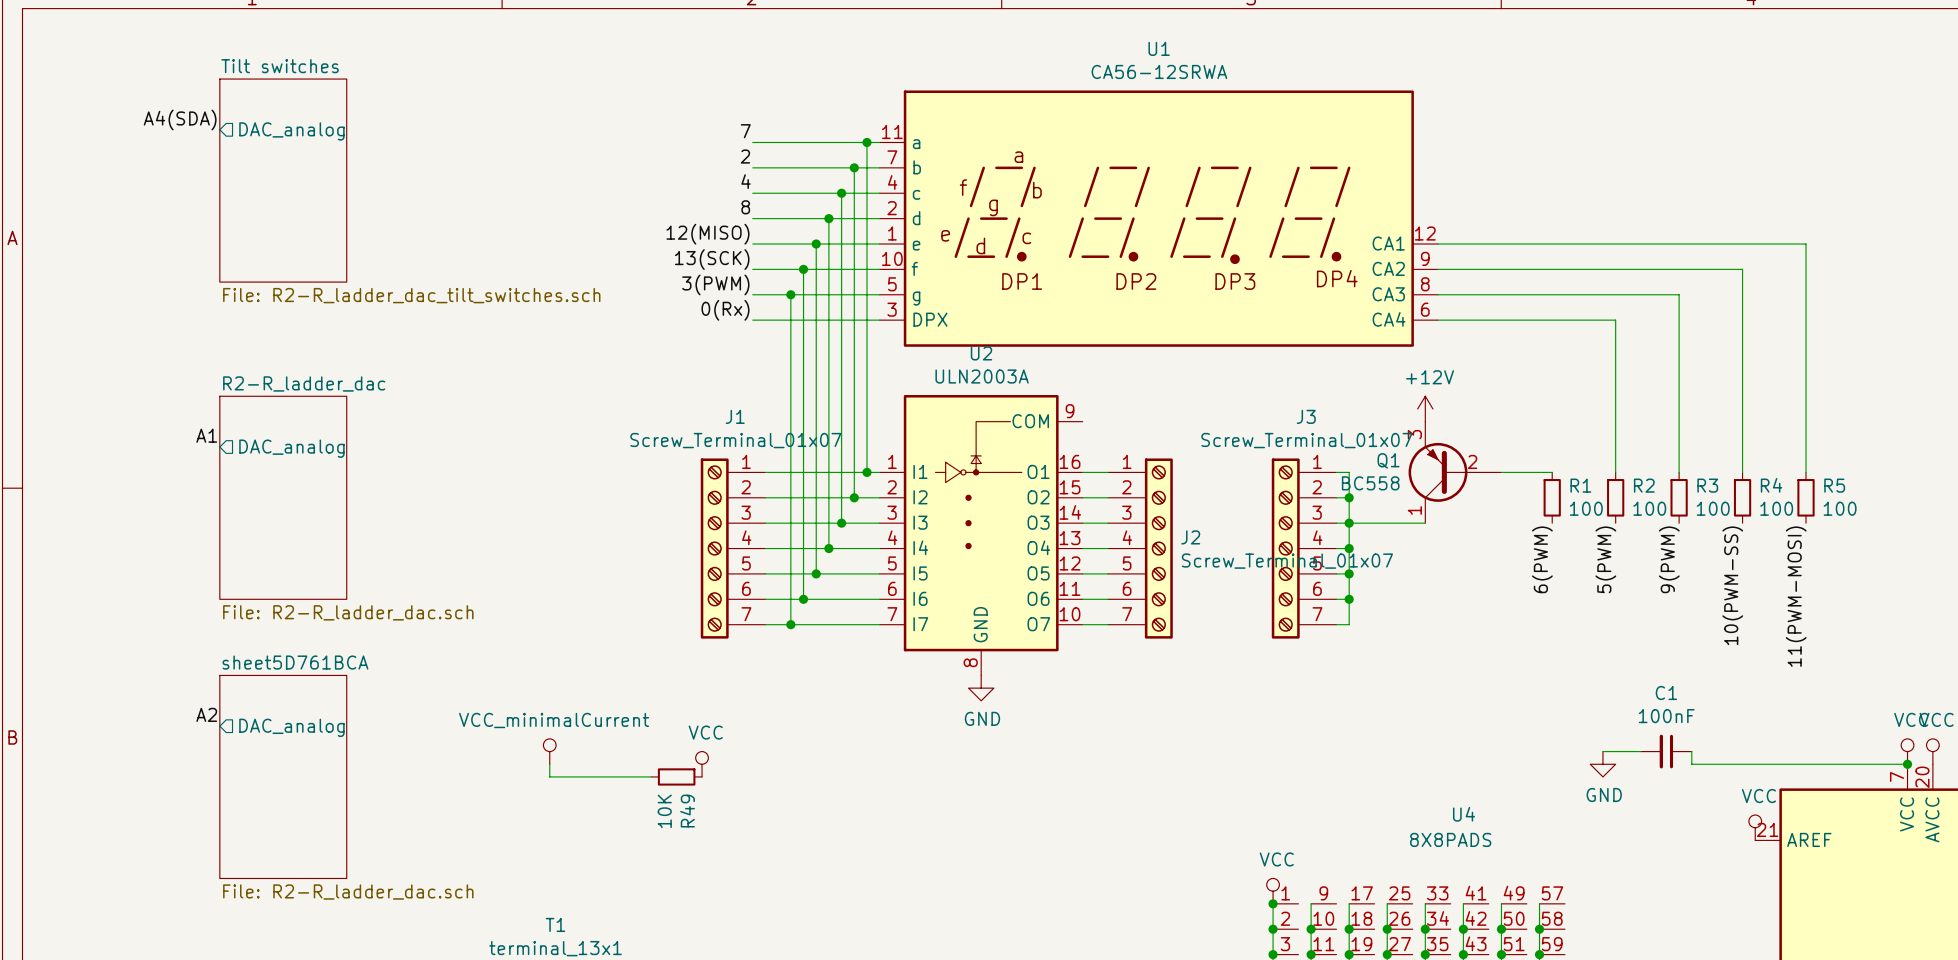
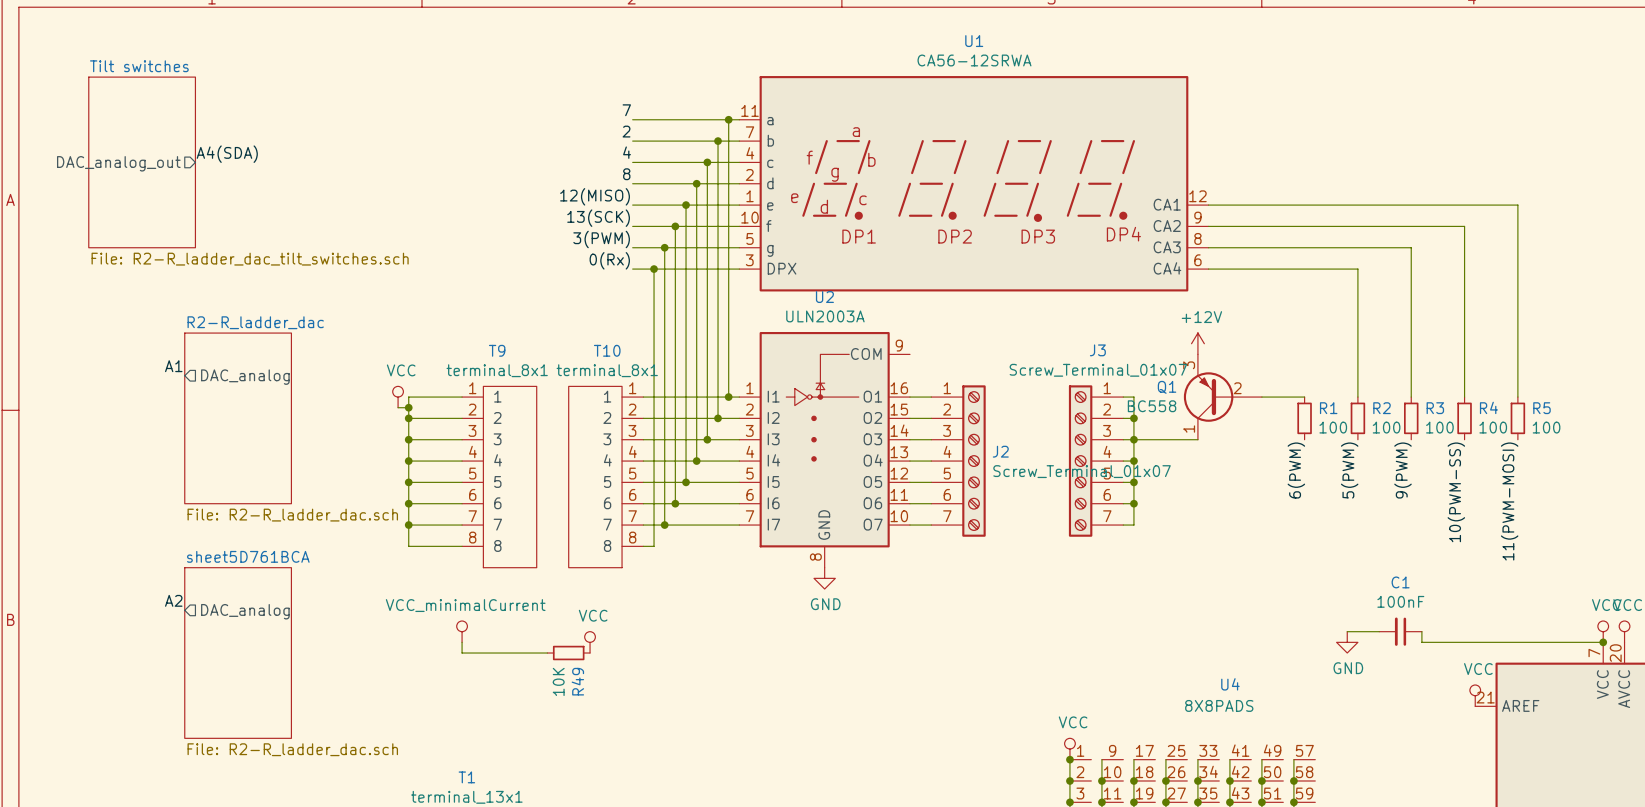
label position: A4(SDA) (180, 119) -> A4(SDA) (227, 154)
sheet pin: DAC_analog (291, 131) -> none
sheet Tilt switches position: (283, 180) -> (142, 162)
sheet pin: none -> DAC_analog_out (118, 163)
wire: none -> (654, 269) (654, 546) (643, 546)
junction: none -> (654, 269)
power symbol: none -> VCC (398, 397)
wire: none -> (462, 397) (408, 397) (408, 546) (462, 546)
wire: none -> (398, 407) (408, 407)
junction: none -> (408, 407)
wire: none -> (408, 418) (462, 418)
junction: none -> (408, 418)
wire: none -> (408, 439) (462, 439)
junction: none -> (408, 439)
wire: none -> (408, 461) (462, 461)
junction: none -> (408, 461)
J1: Screw_Terminal_01x07 (733, 548) -> none
T9: none -> terminal_8x1 (499, 477)
T10: none -> terminal_8x1 (606, 477)
wire: none -> (408, 482) (462, 482)
junction: none -> (408, 482)
wire: none -> (408, 503) (462, 503)
junction: none -> (408, 503)
wire: none -> (408, 525) (462, 525)
junction: none -> (408, 525)

